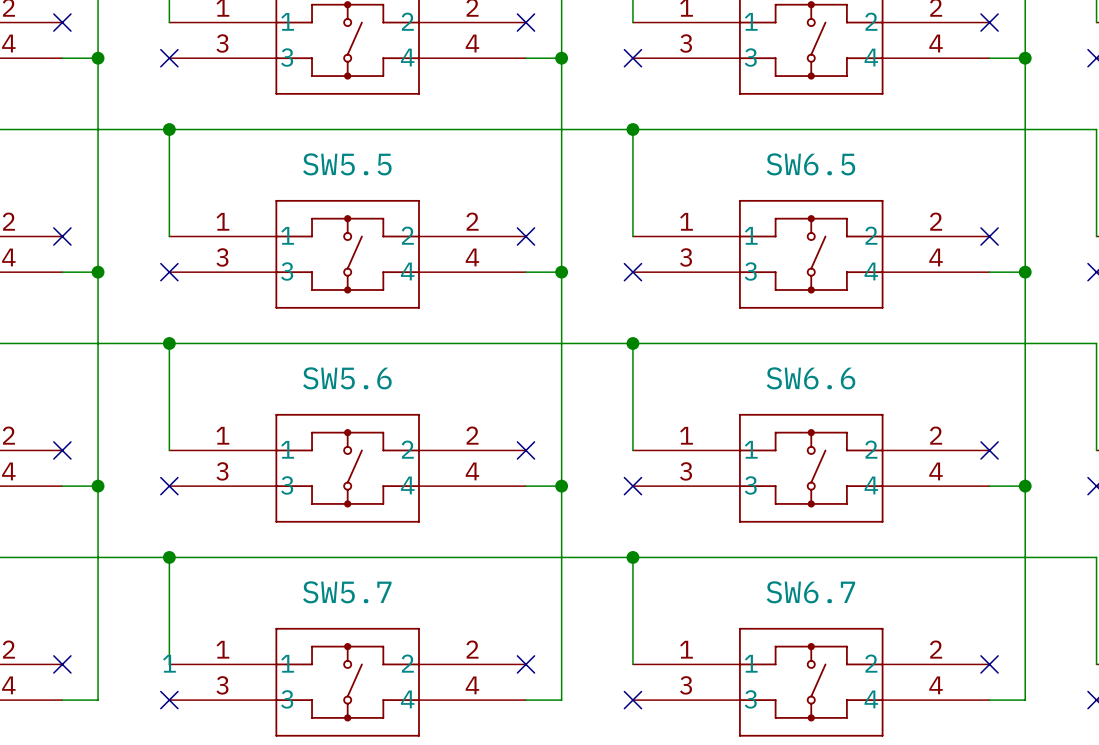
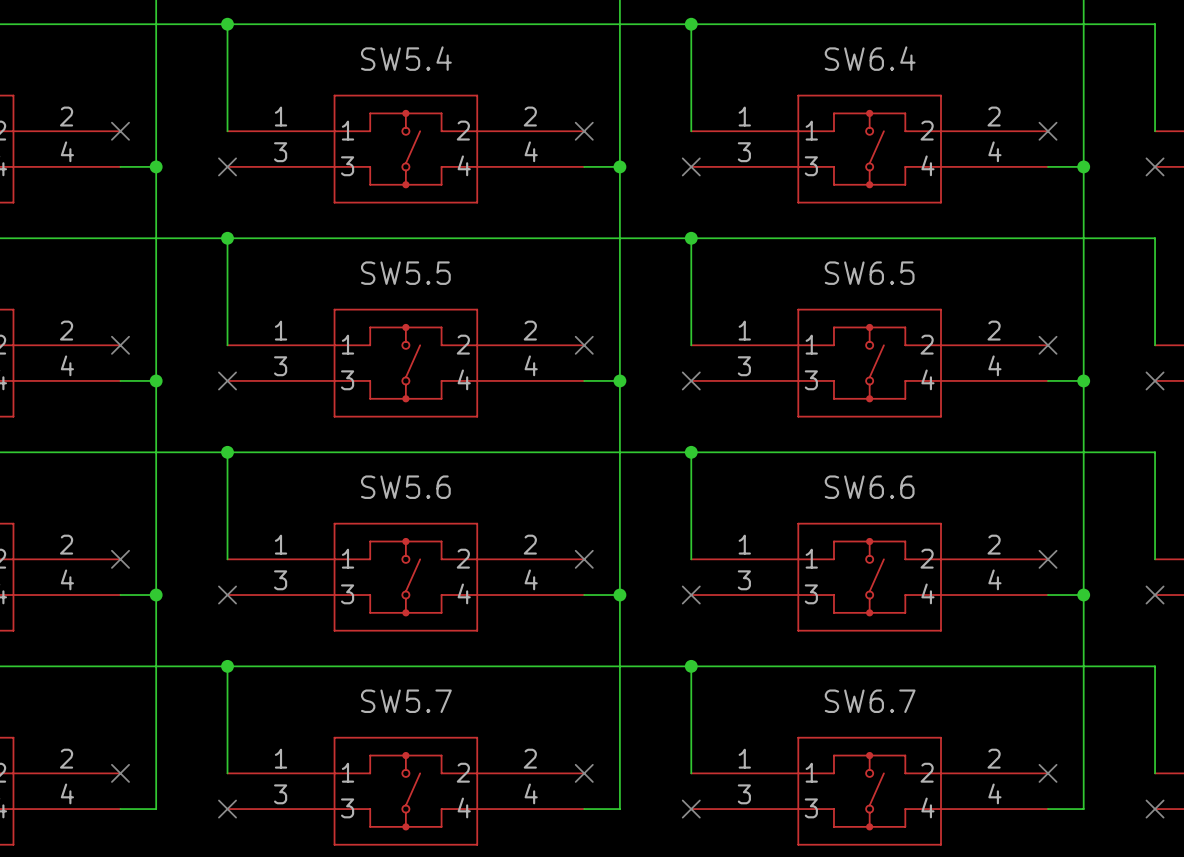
SW5.7 text: 1 (169, 663) -> none

